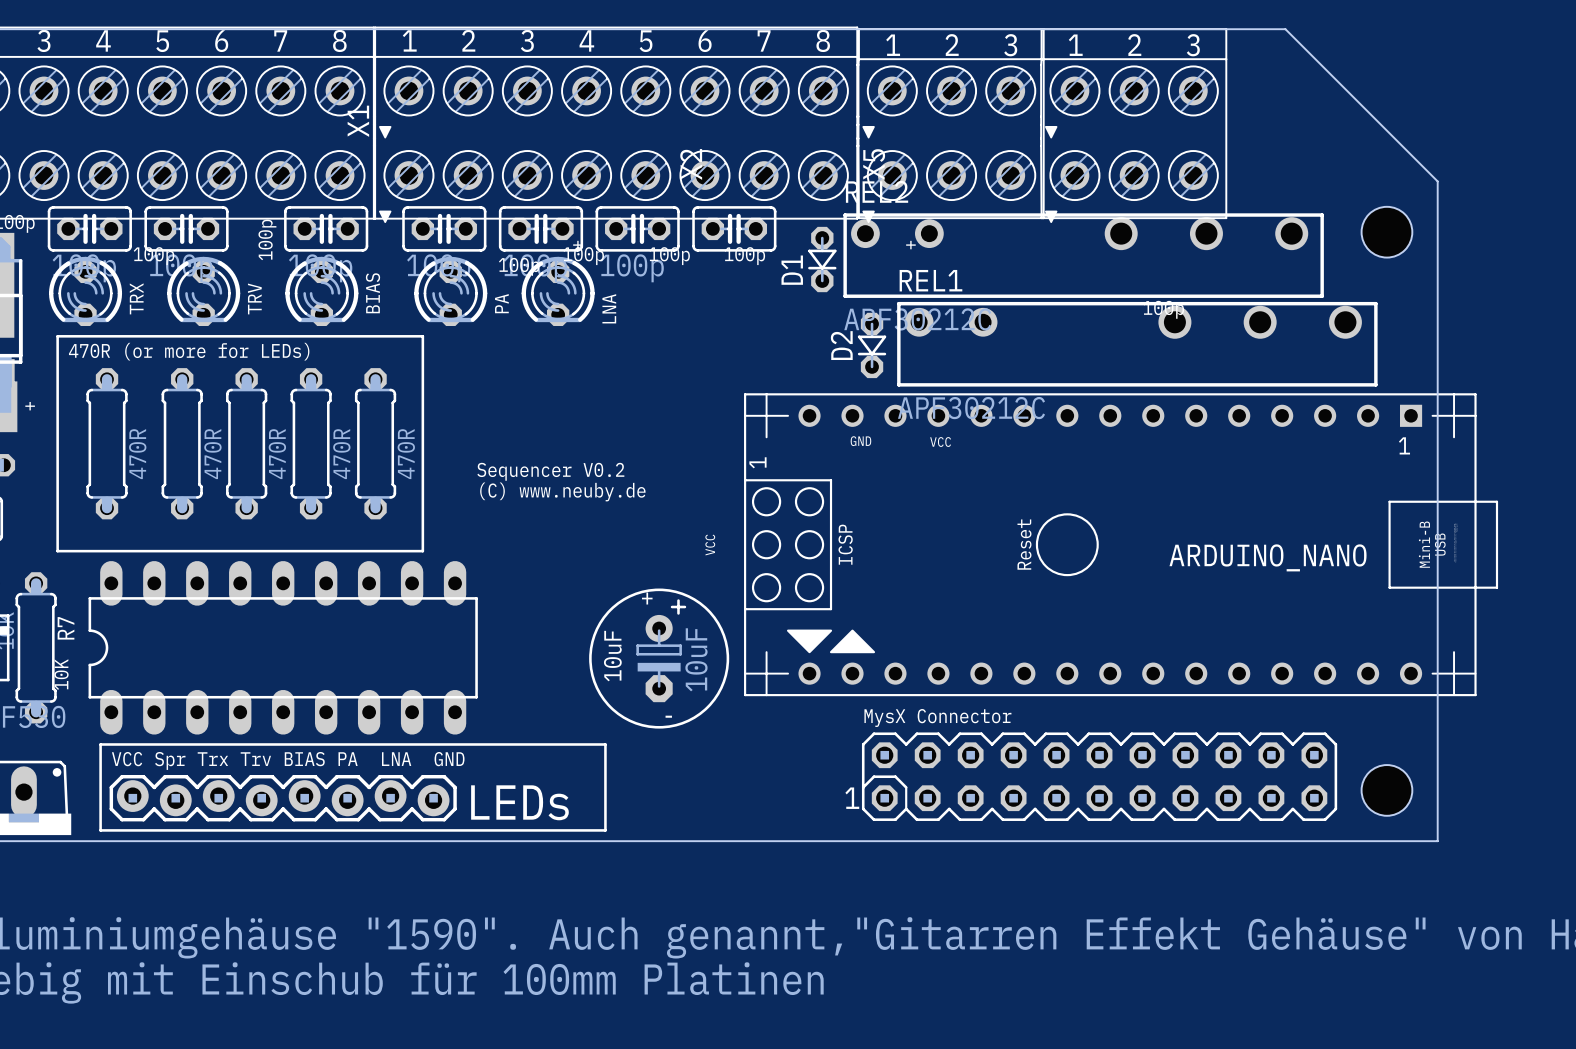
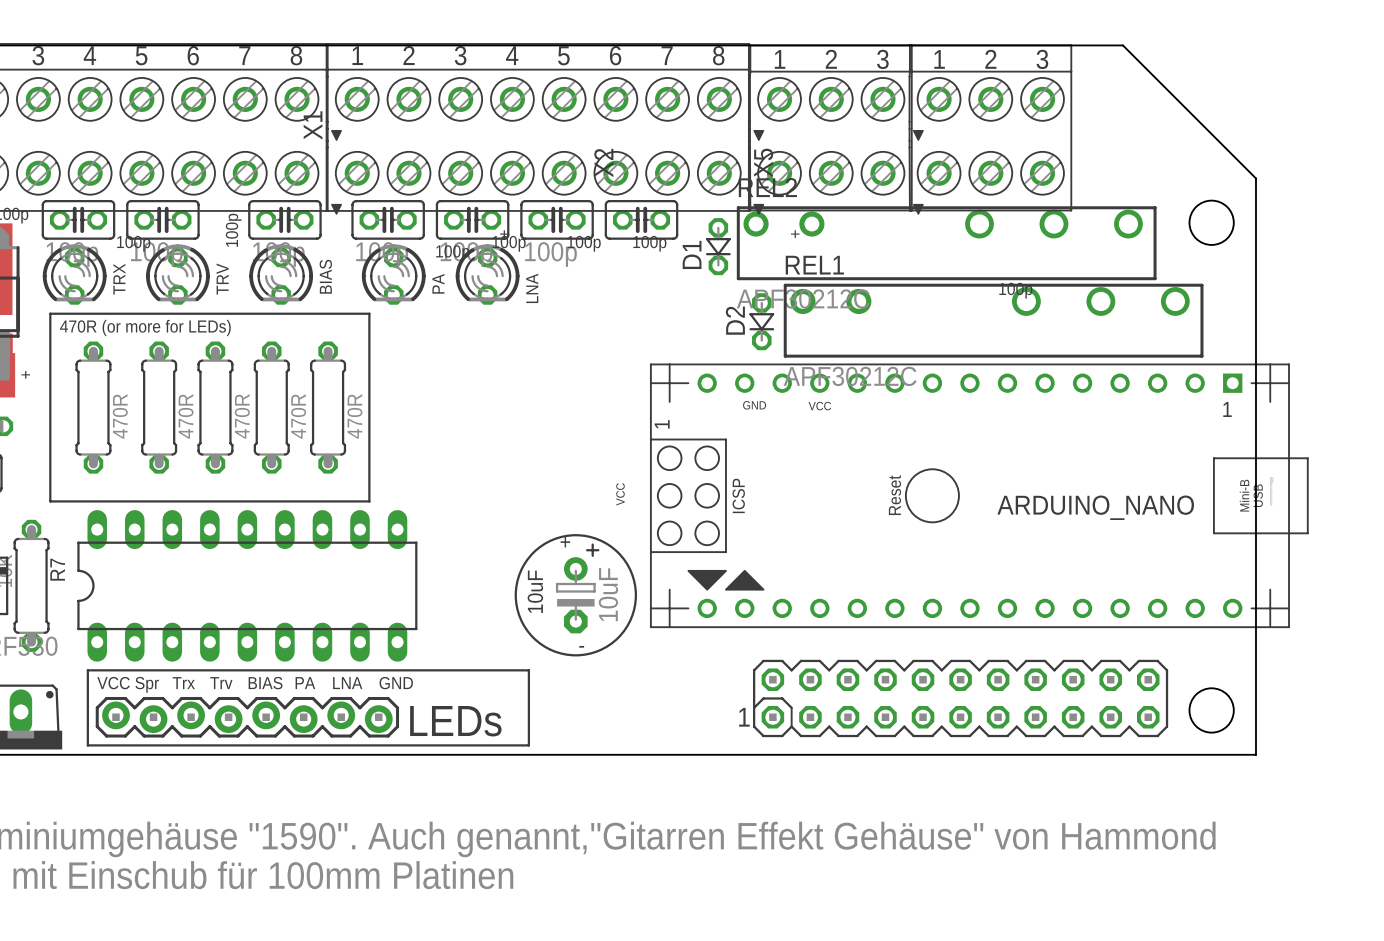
text: Sequencer V0.2 (550, 471) -> none
text: (C) www.neuby.de (562, 491) -> none
text: 10K (61, 674) -> none
text: MysX Connector (937, 717) -> none

